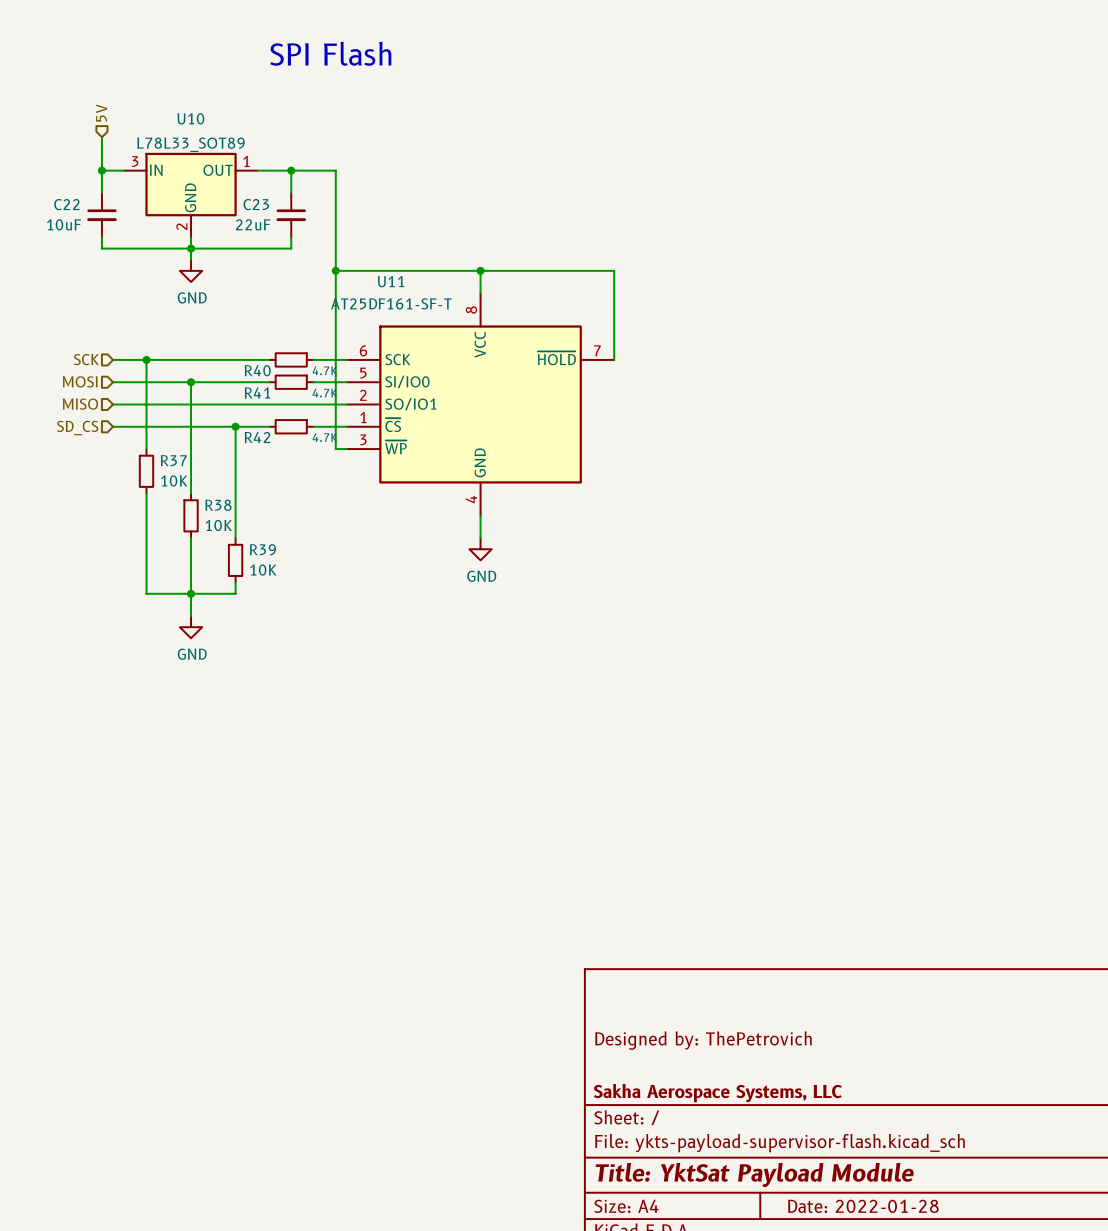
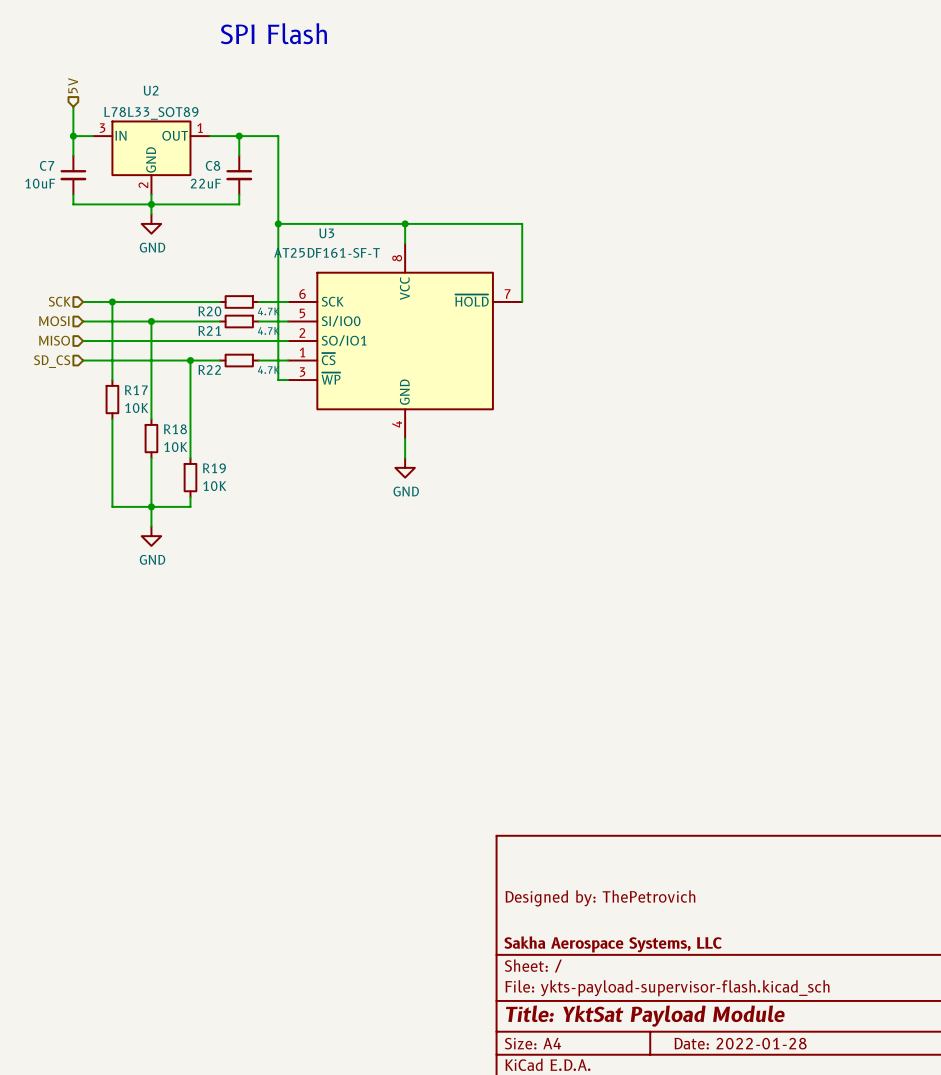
U10 name: U10 (190, 118) -> U2 (151, 90)
C22 name: C22 (66, 204) -> C7 (47, 165)
C23 name: C23 (256, 204) -> C8 (213, 165)
U11 name: U11 (391, 281) -> U3 (326, 233)
R40 name: R40 (257, 370) -> R20 (209, 311)
R41 name: R41 (257, 392) -> R21 (209, 330)
R42 name: R42 (257, 437) -> R22 (209, 369)
R37 name: R37 (173, 460) -> R17 (136, 390)
R38 name: R38 (218, 505) -> R18 (175, 429)
R39 name: R39 (262, 549) -> R19 (214, 468)

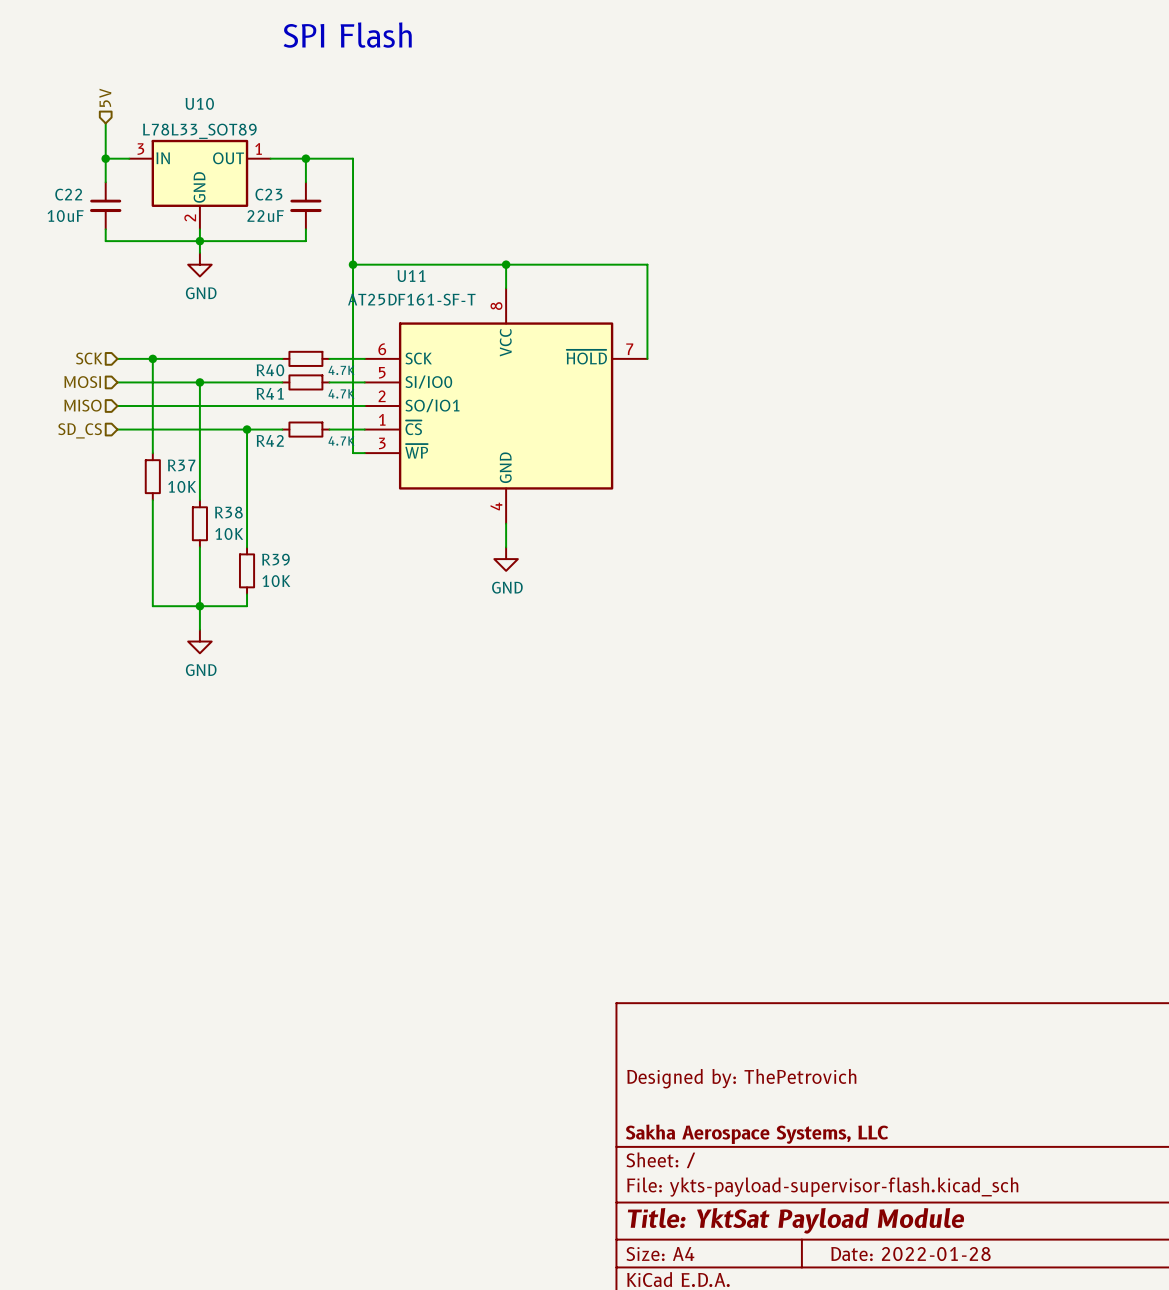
U2 name: U2 (151, 90) -> U10 (199, 103)
C7 name: C7 (47, 165) -> C22 (68, 194)
C8 name: C8 (213, 165) -> C23 (268, 194)
U3 name: U3 (326, 233) -> U11 (411, 276)
R20 name: R20 (209, 311) -> R40 (270, 370)
R21 name: R21 (209, 330) -> R41 (270, 393)
R22 name: R22 (209, 369) -> R42 (270, 440)
R17 name: R17 (136, 390) -> R37 (181, 465)
R18 name: R18 (175, 429) -> R38 (228, 512)
R19 name: R19 (214, 468) -> R39 (275, 559)

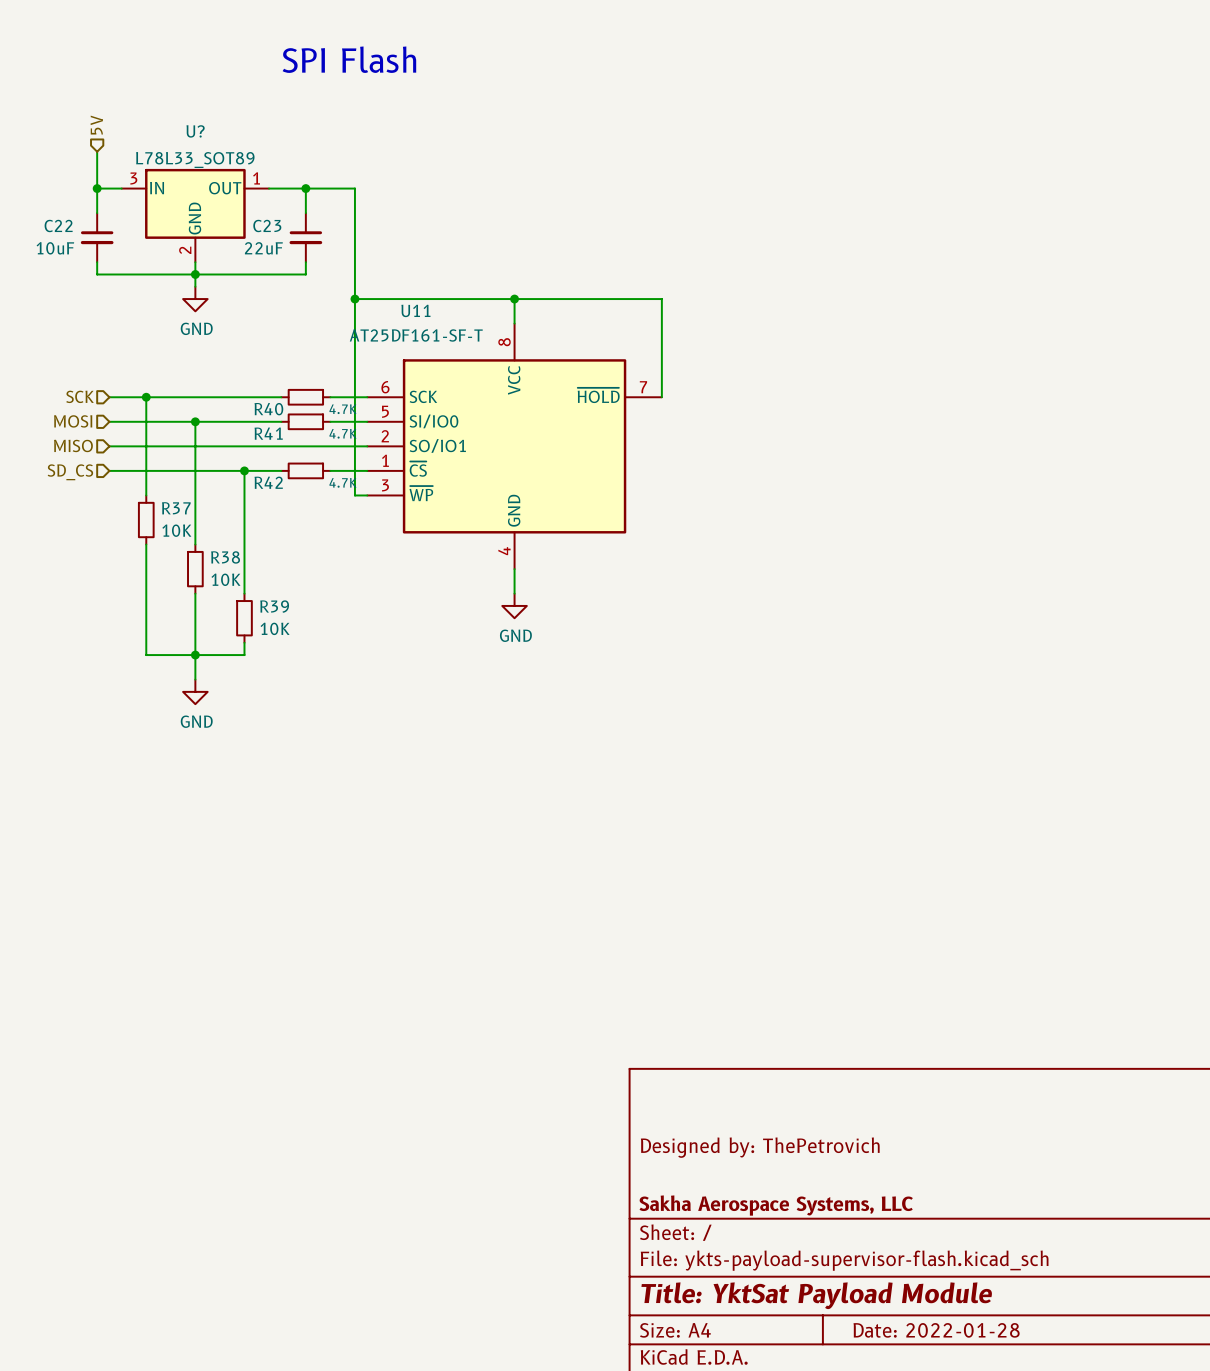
U10 name: U10 (199, 103) -> U? (195, 131)

